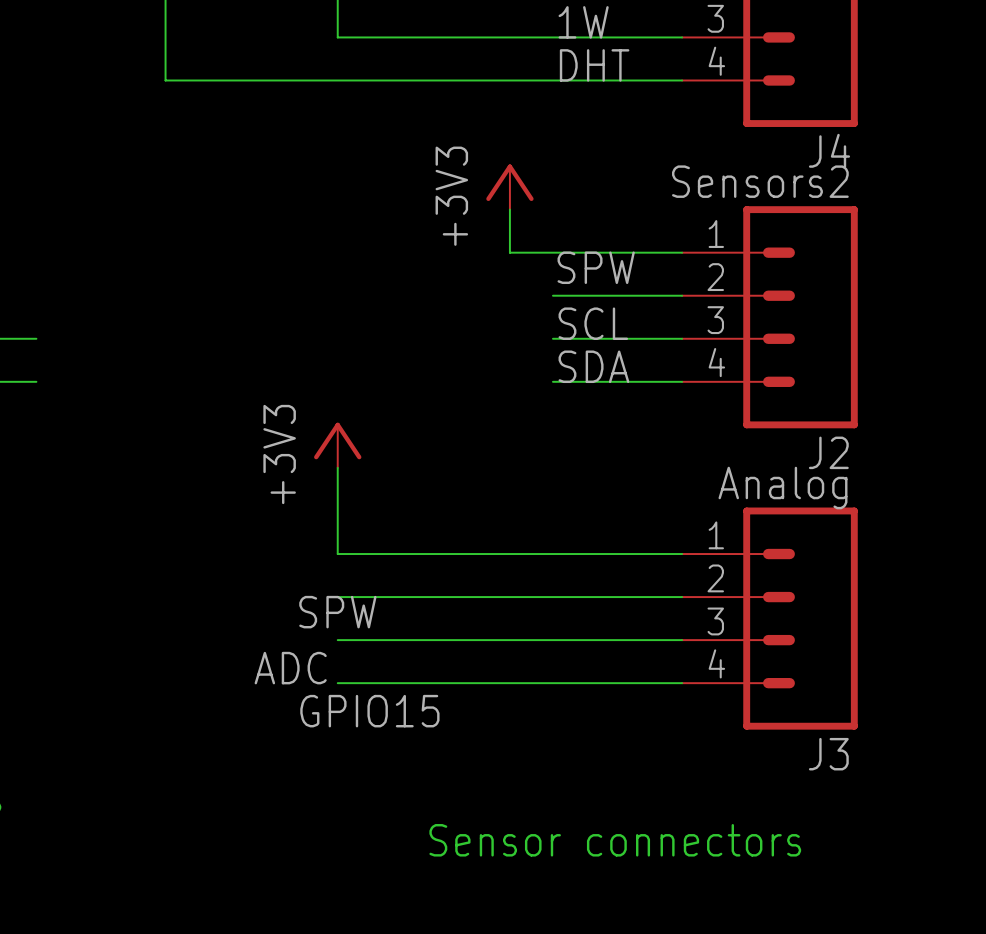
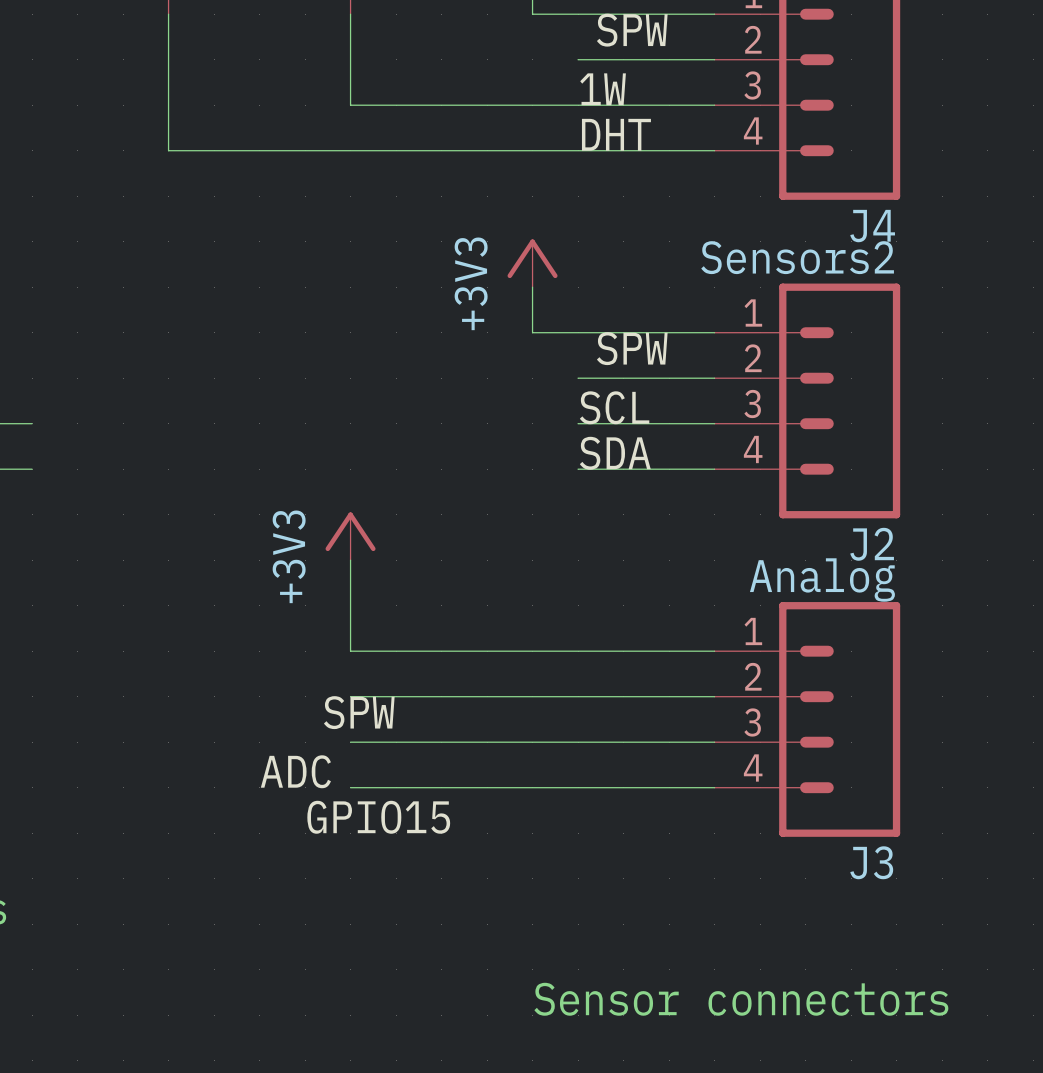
text position: Sensor connectors (615, 840) -> Sensor connectors (741, 999)

